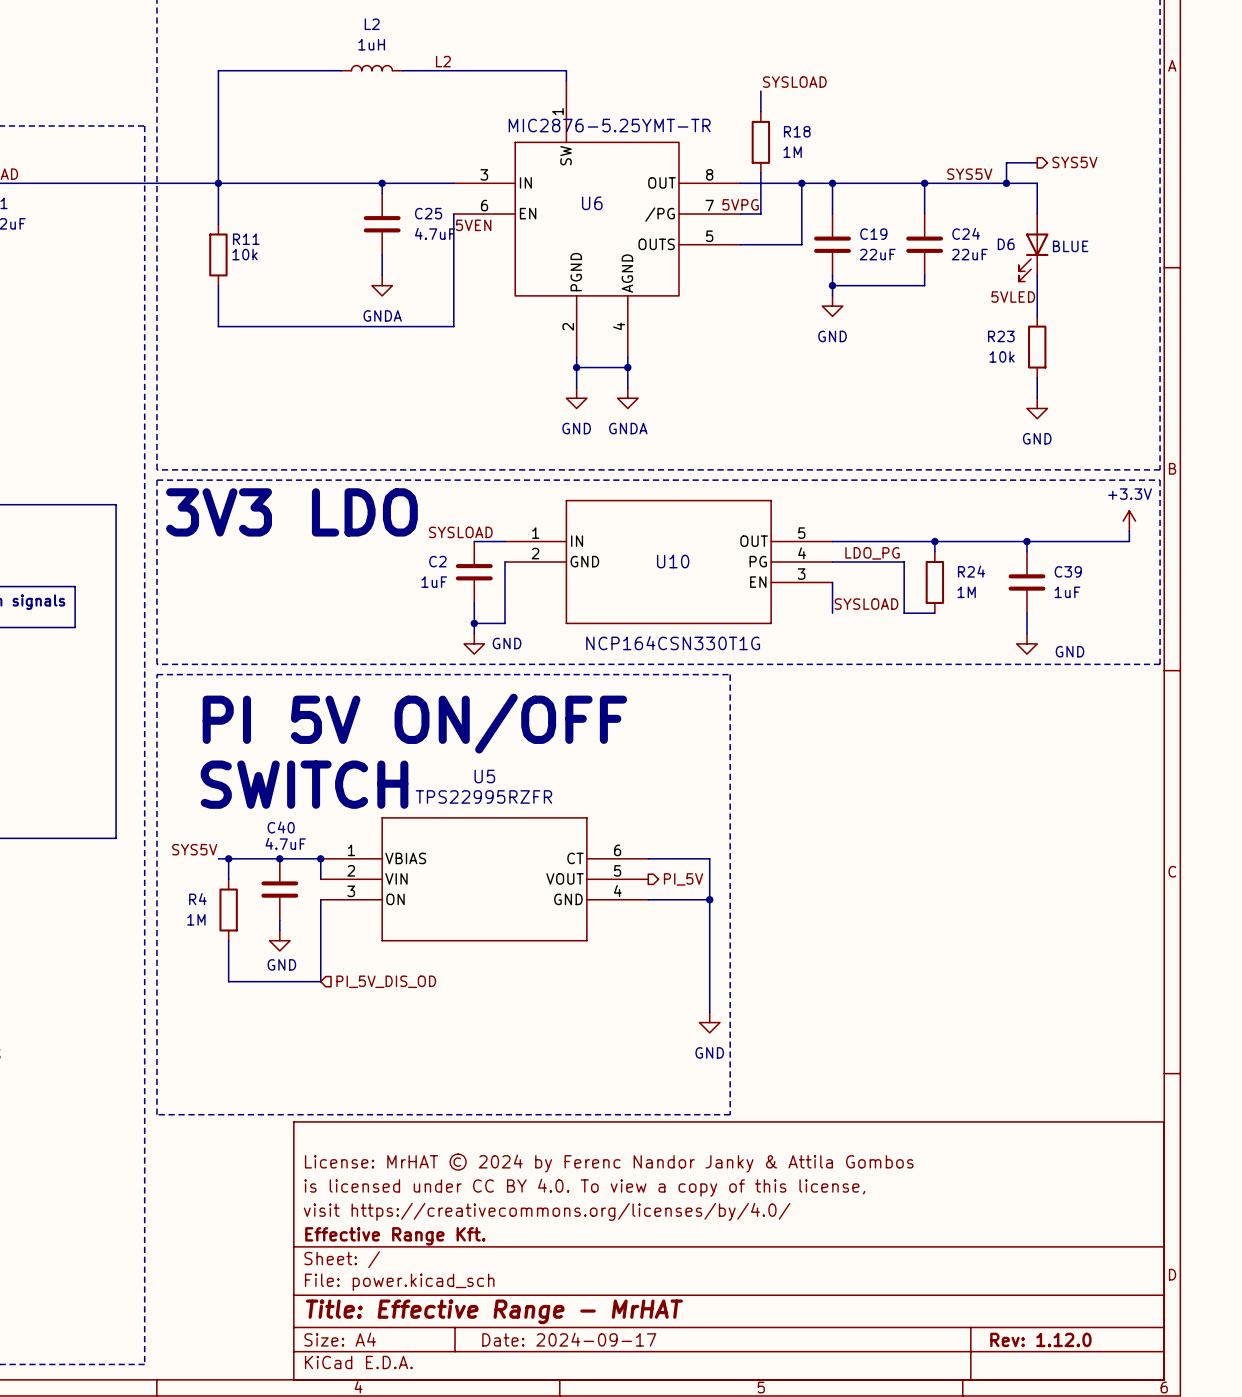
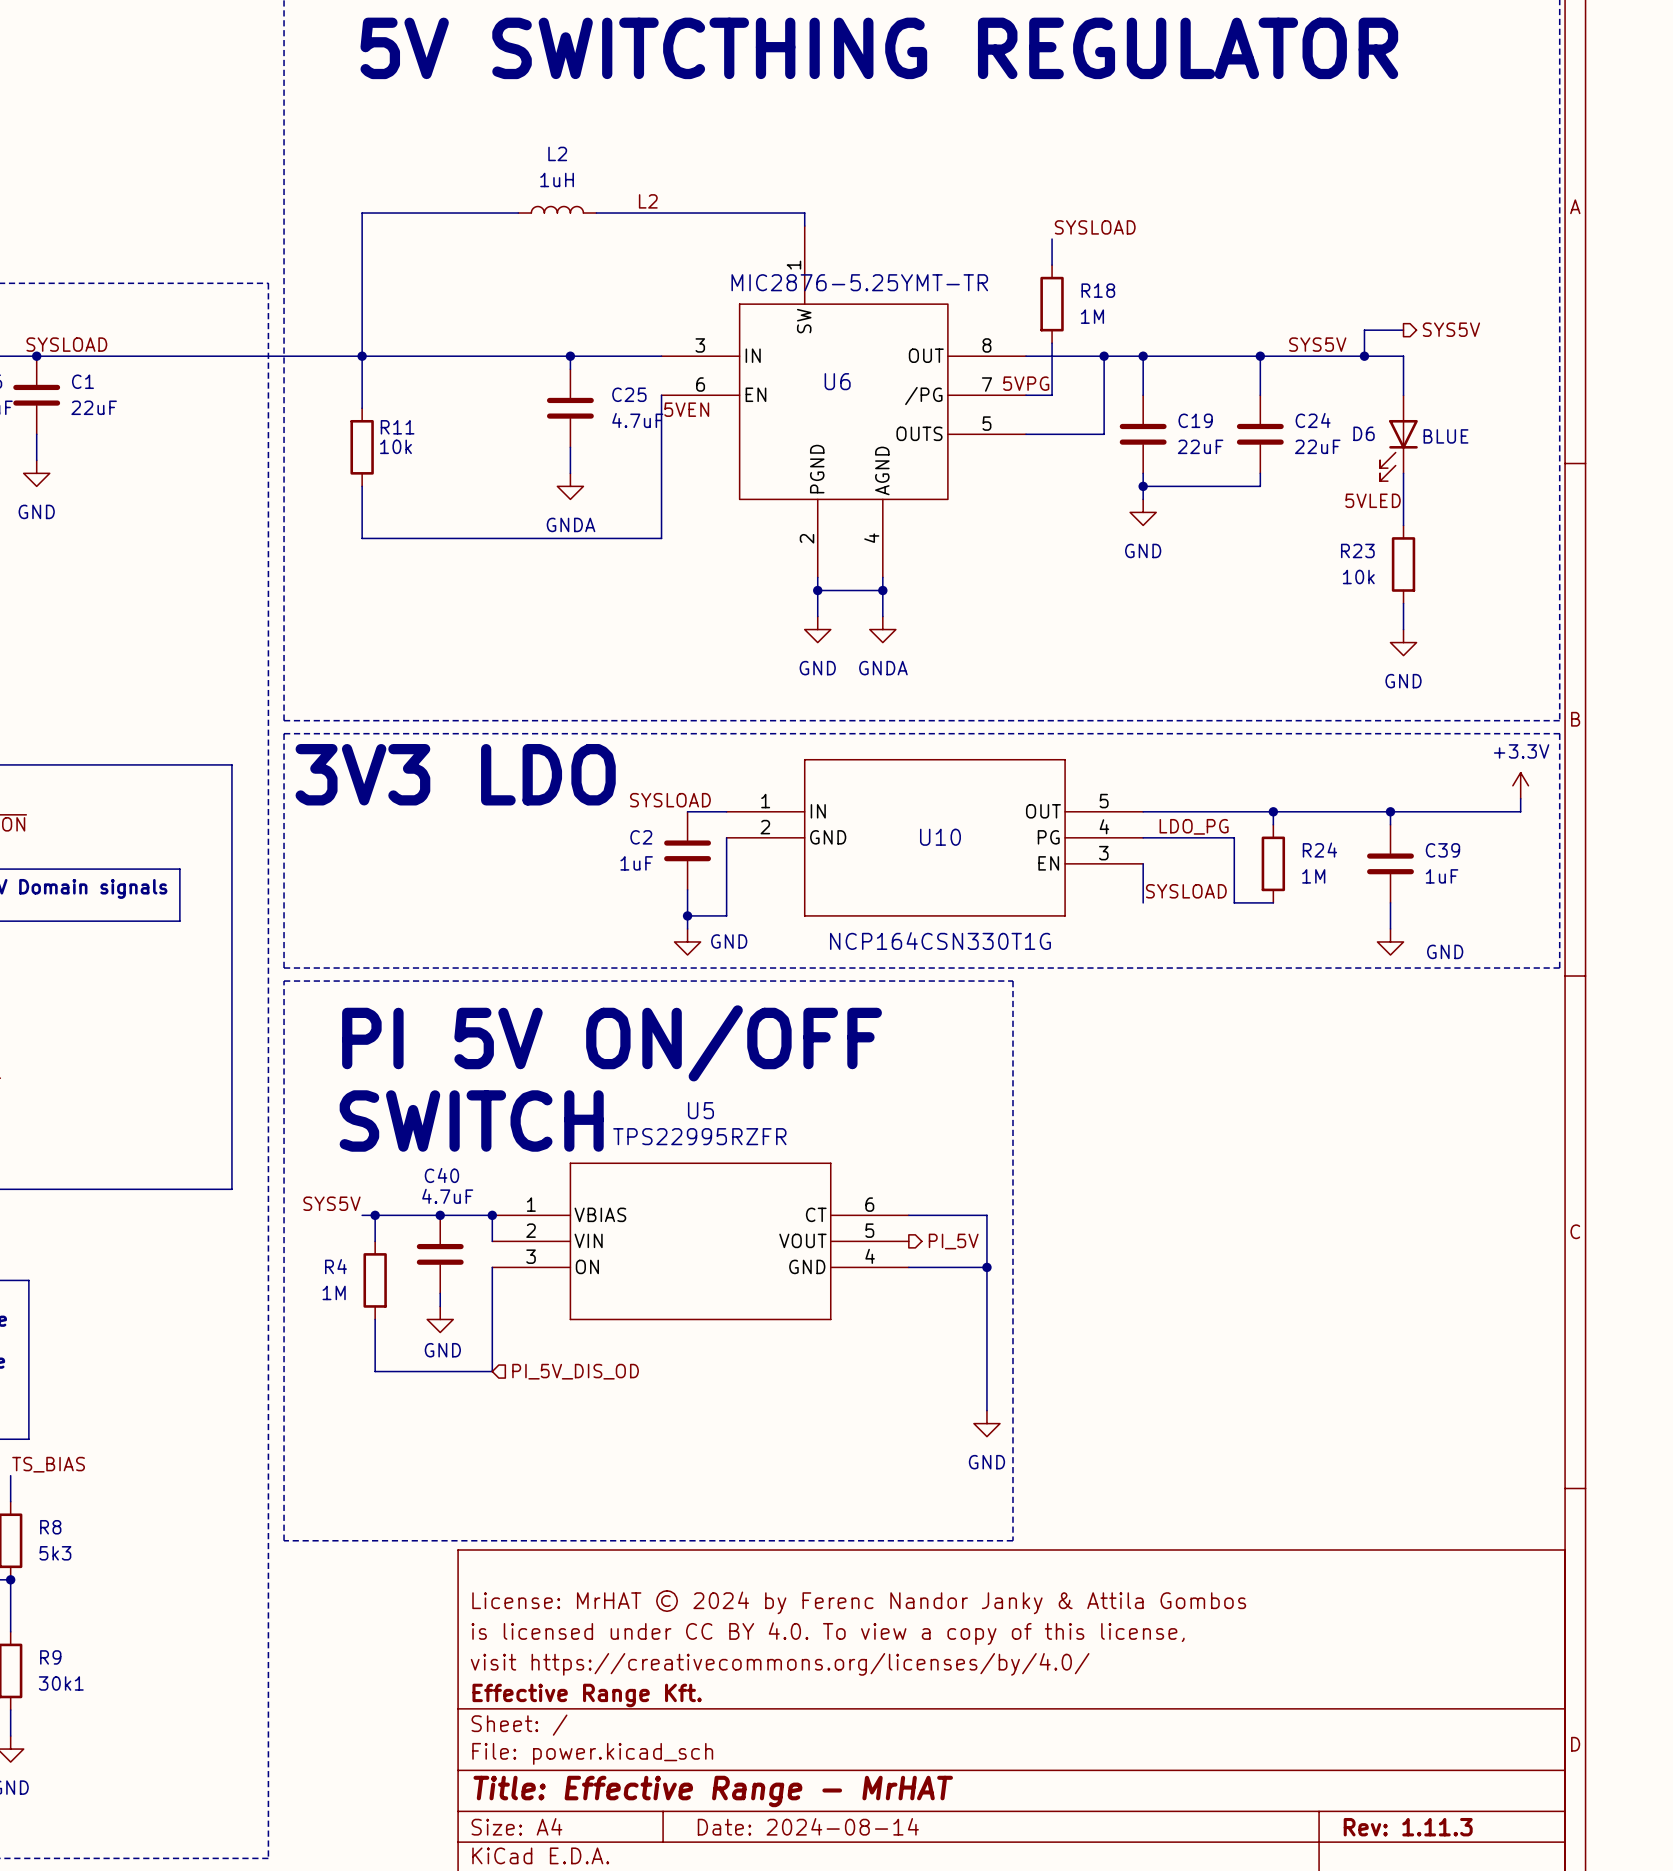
title block: Date: 2024-09-17 (569, 1339) -> Date: 2024-08-14 (808, 1826)
title block: Rev: 1.12.0 (1040, 1339) -> Rev: 1.11.3 (1408, 1827)

